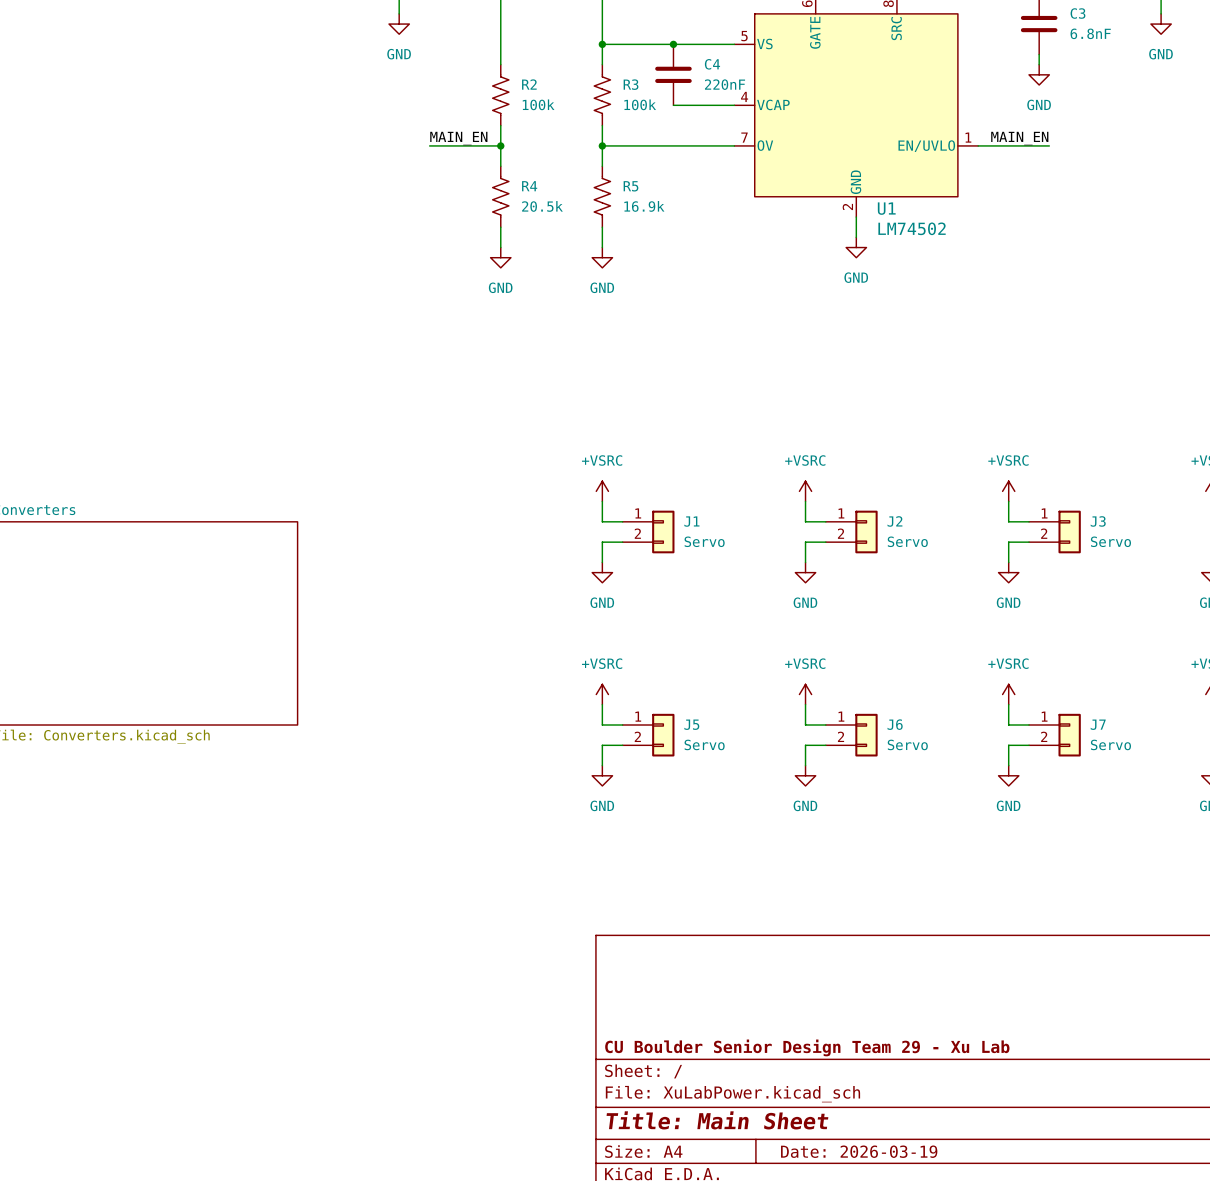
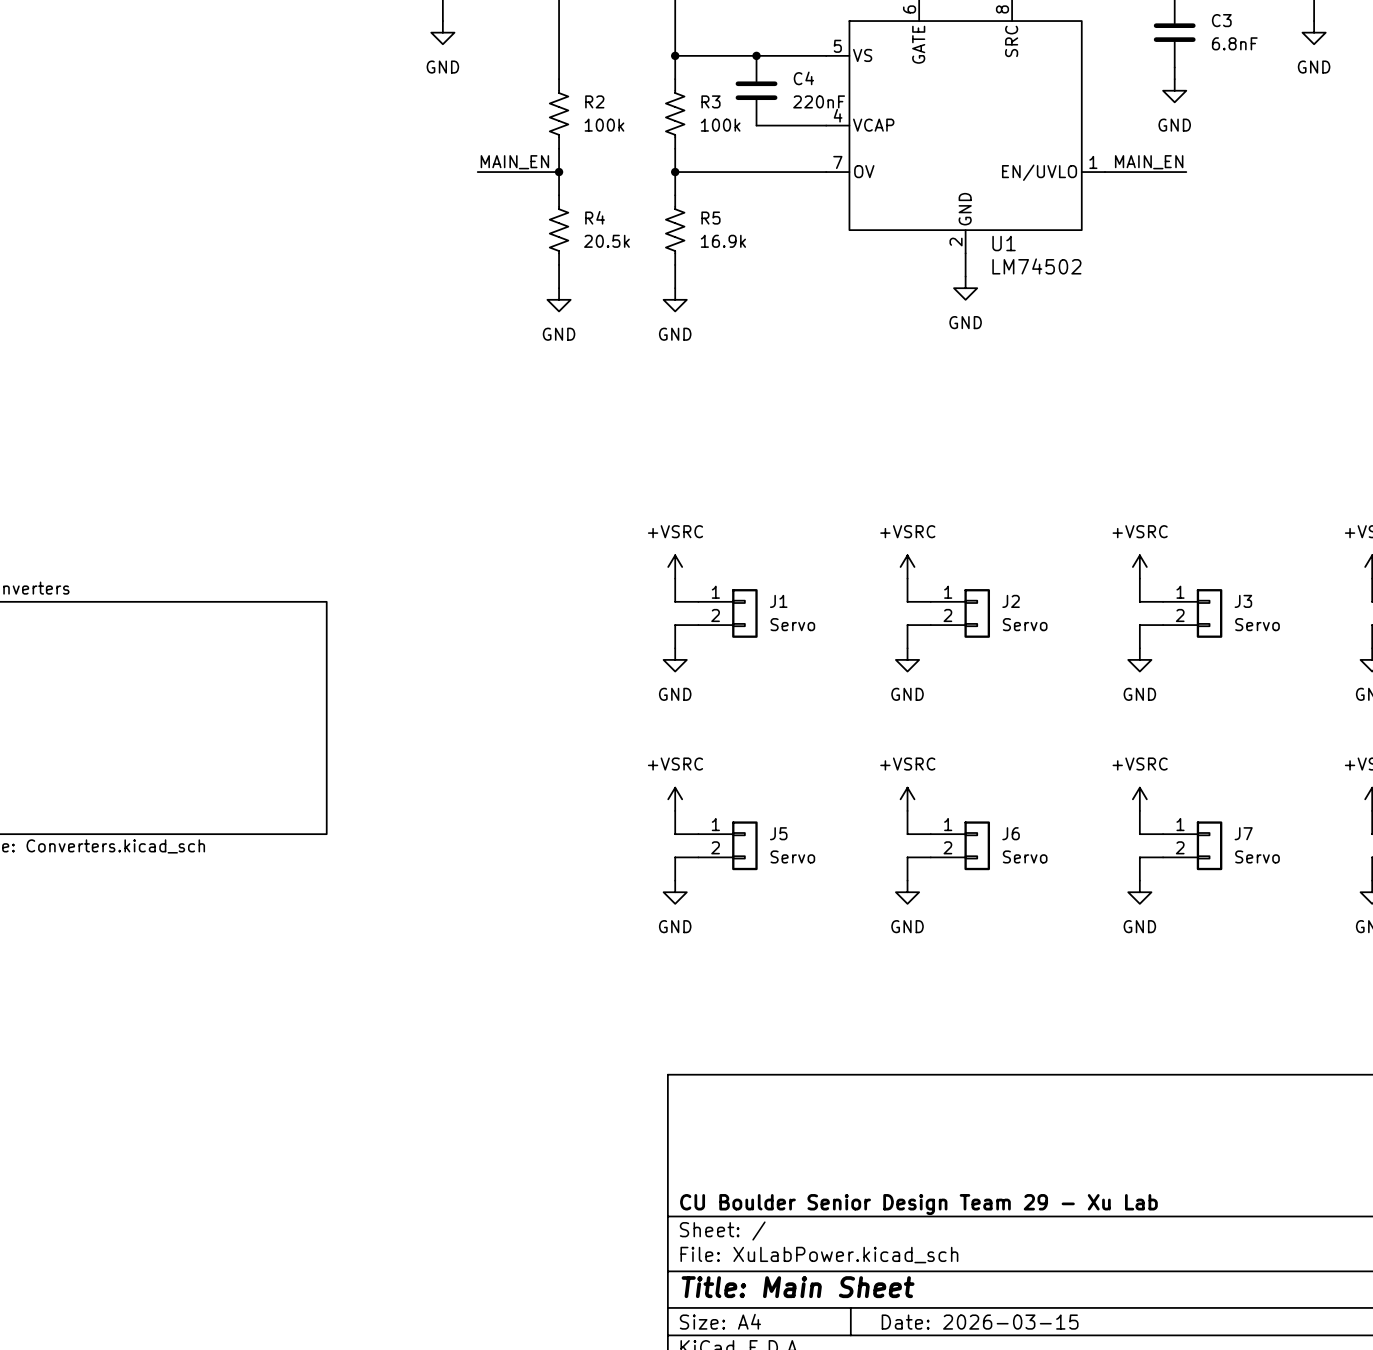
title block: Date: 2026-03-19 (859, 1151) -> Date: 2026-03-15 (980, 1322)

